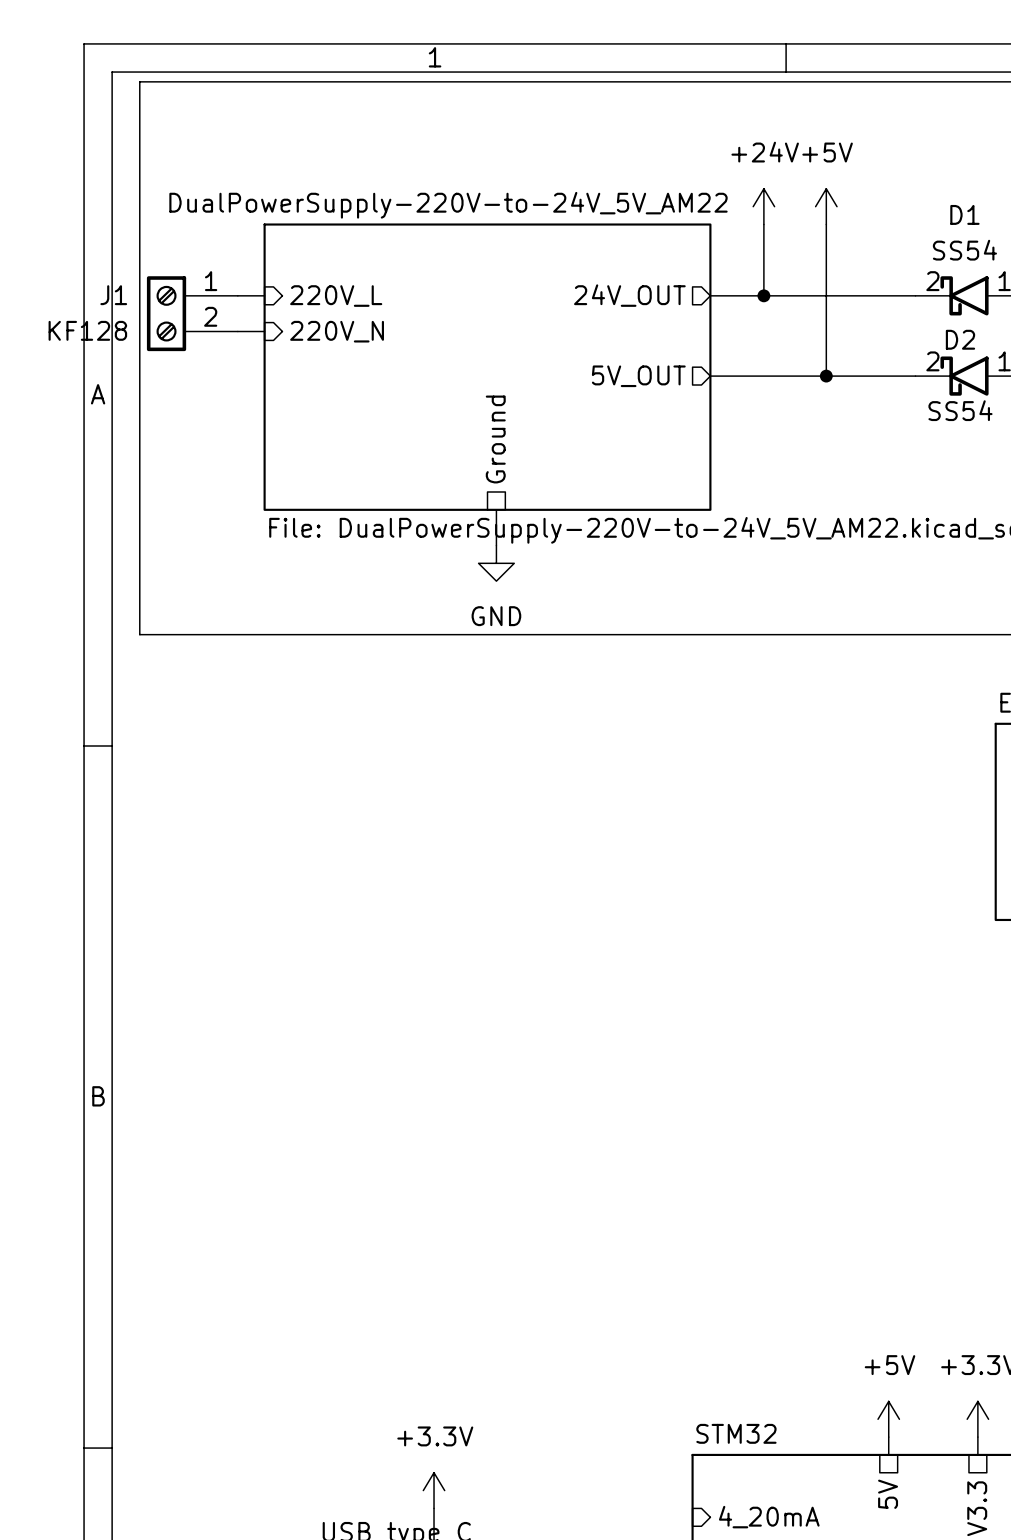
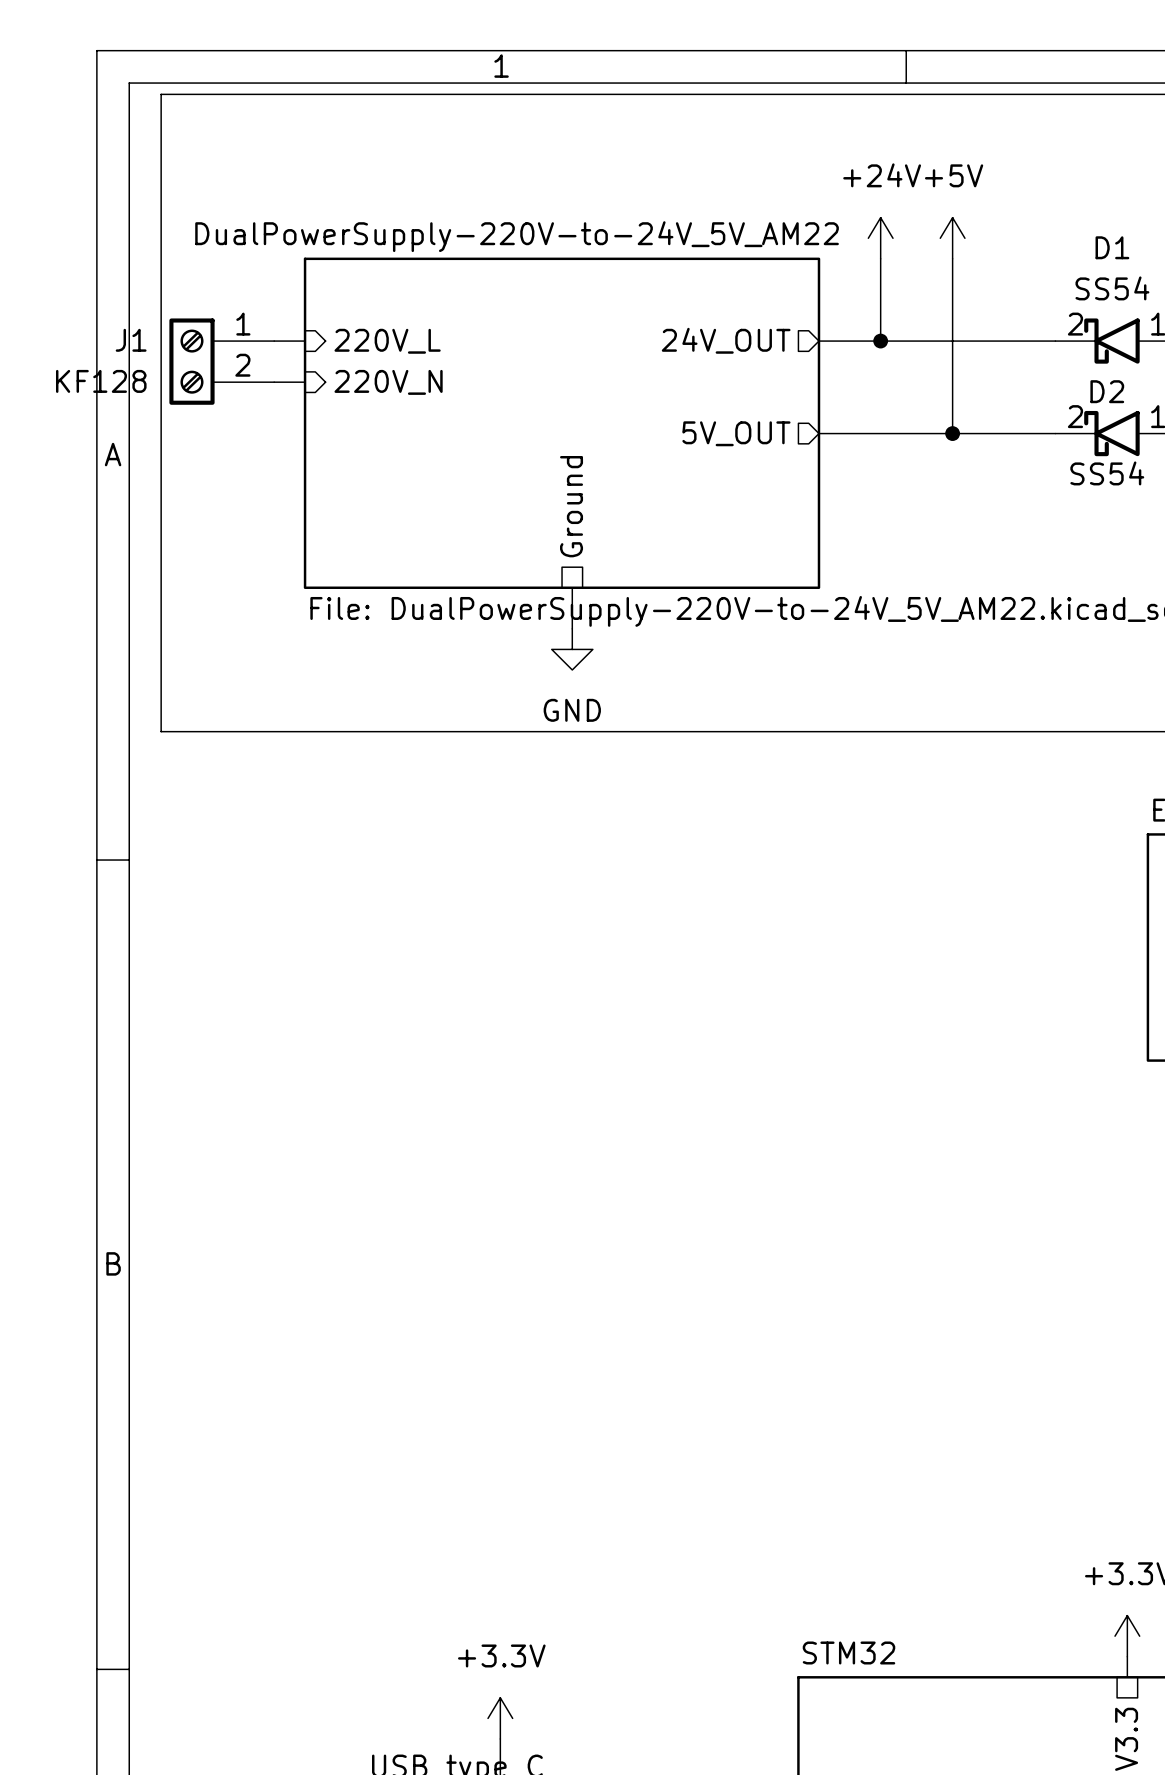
power symbol: +5V (888, 1419) -> none
wire: (888, 1437) (888, 1454) -> none
sheet pin: 5V (888, 1494) -> none
sheet pin: 4_20mA (769, 1517) -> none

